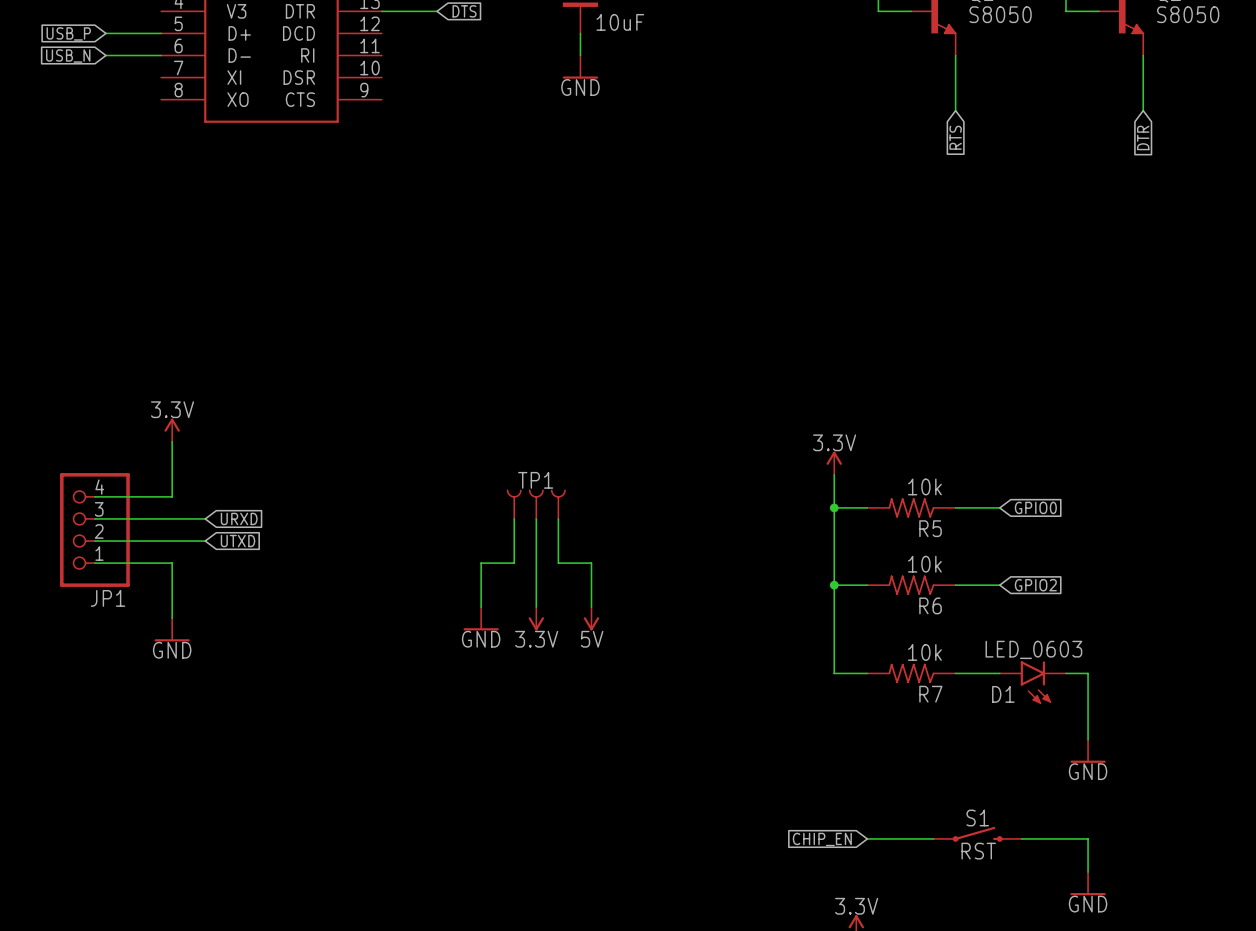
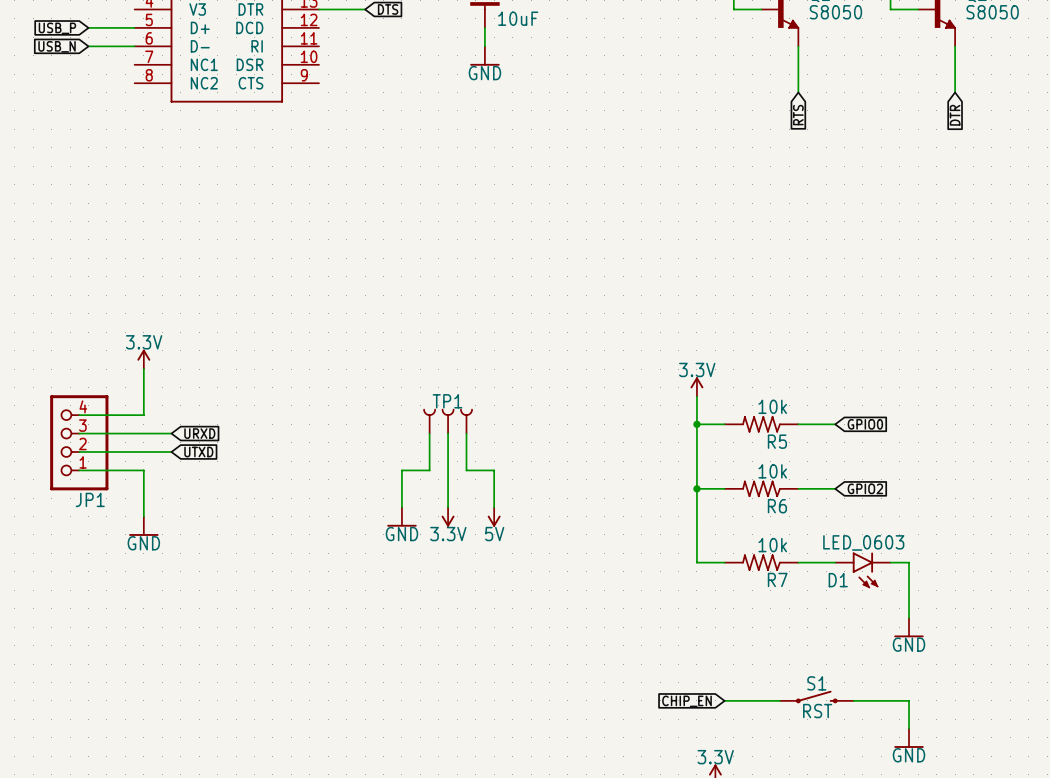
part pin name: XI (234, 77) -> NC1 (204, 64)
part pin name: XO (238, 99) -> NC2 (204, 83)

